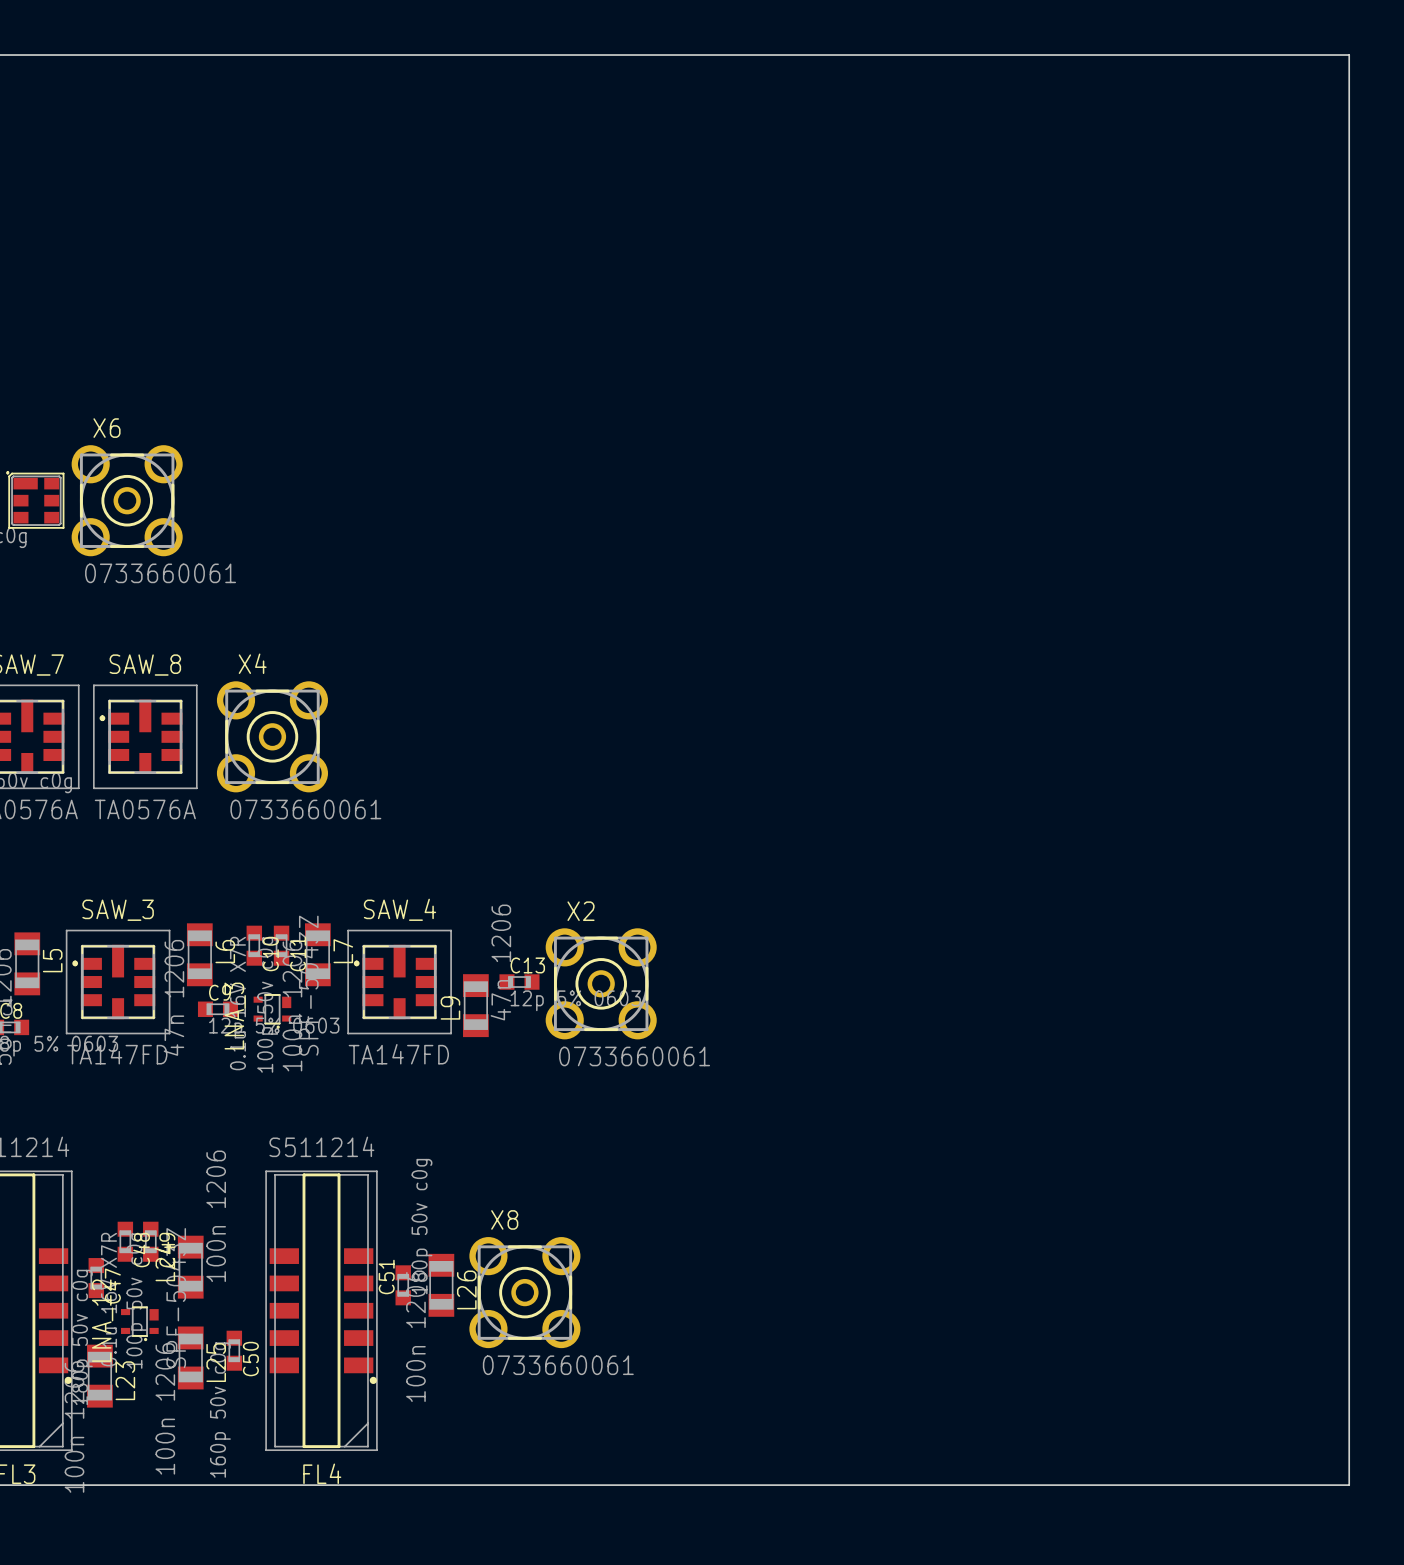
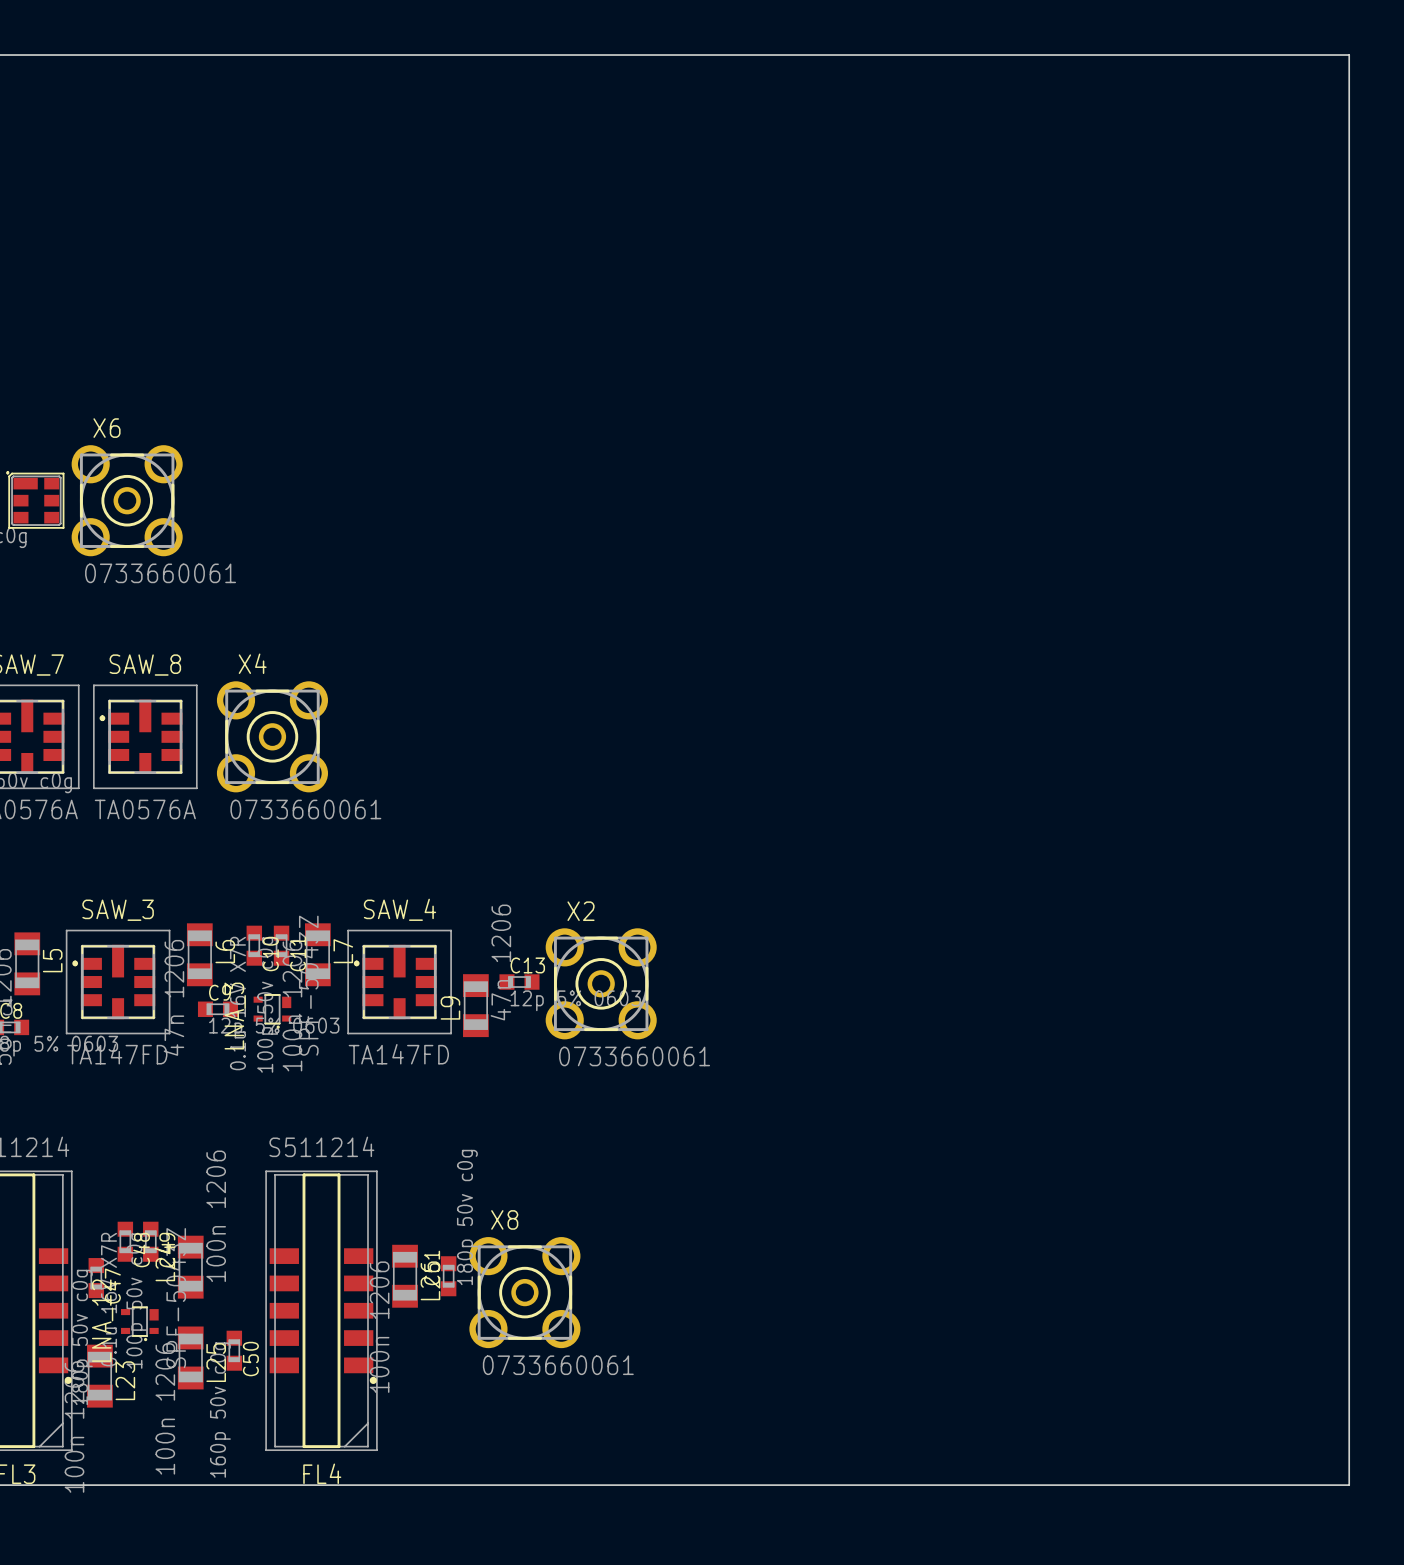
C51 position: (403, 1285) -> (448, 1276)
L26 position: (441, 1285) -> (405, 1276)

